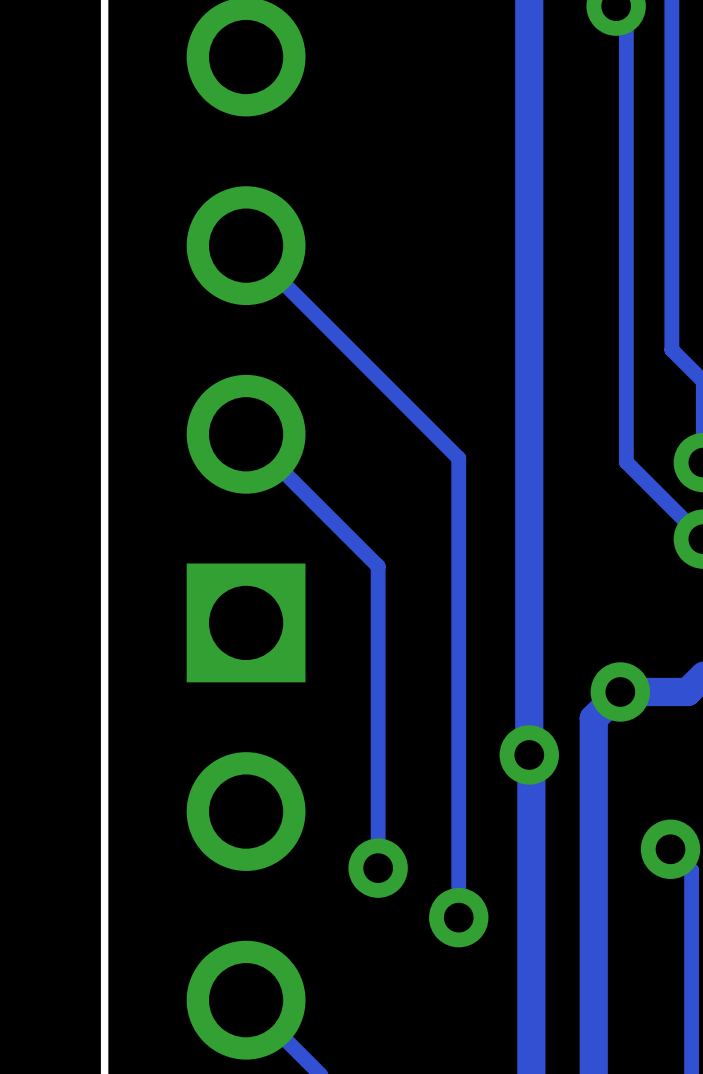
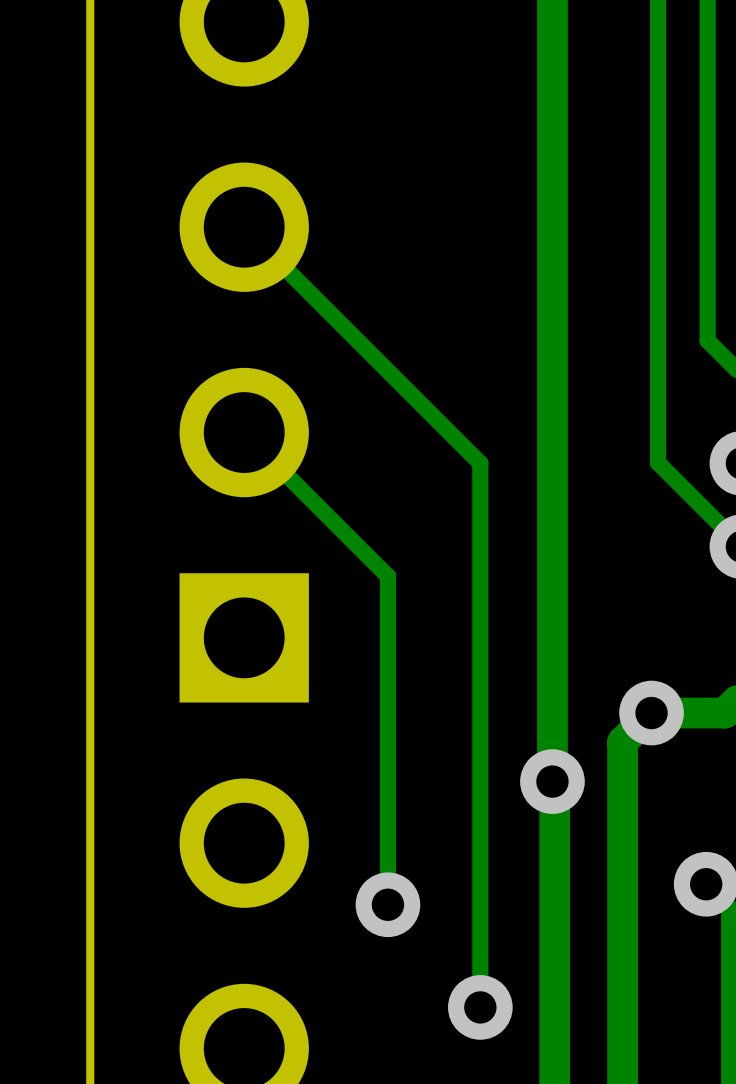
track: (458, 458) (458, 917) -> (475, 458) (480, 463) (480, 1007)
via position: (458, 917) -> (480, 1007)

